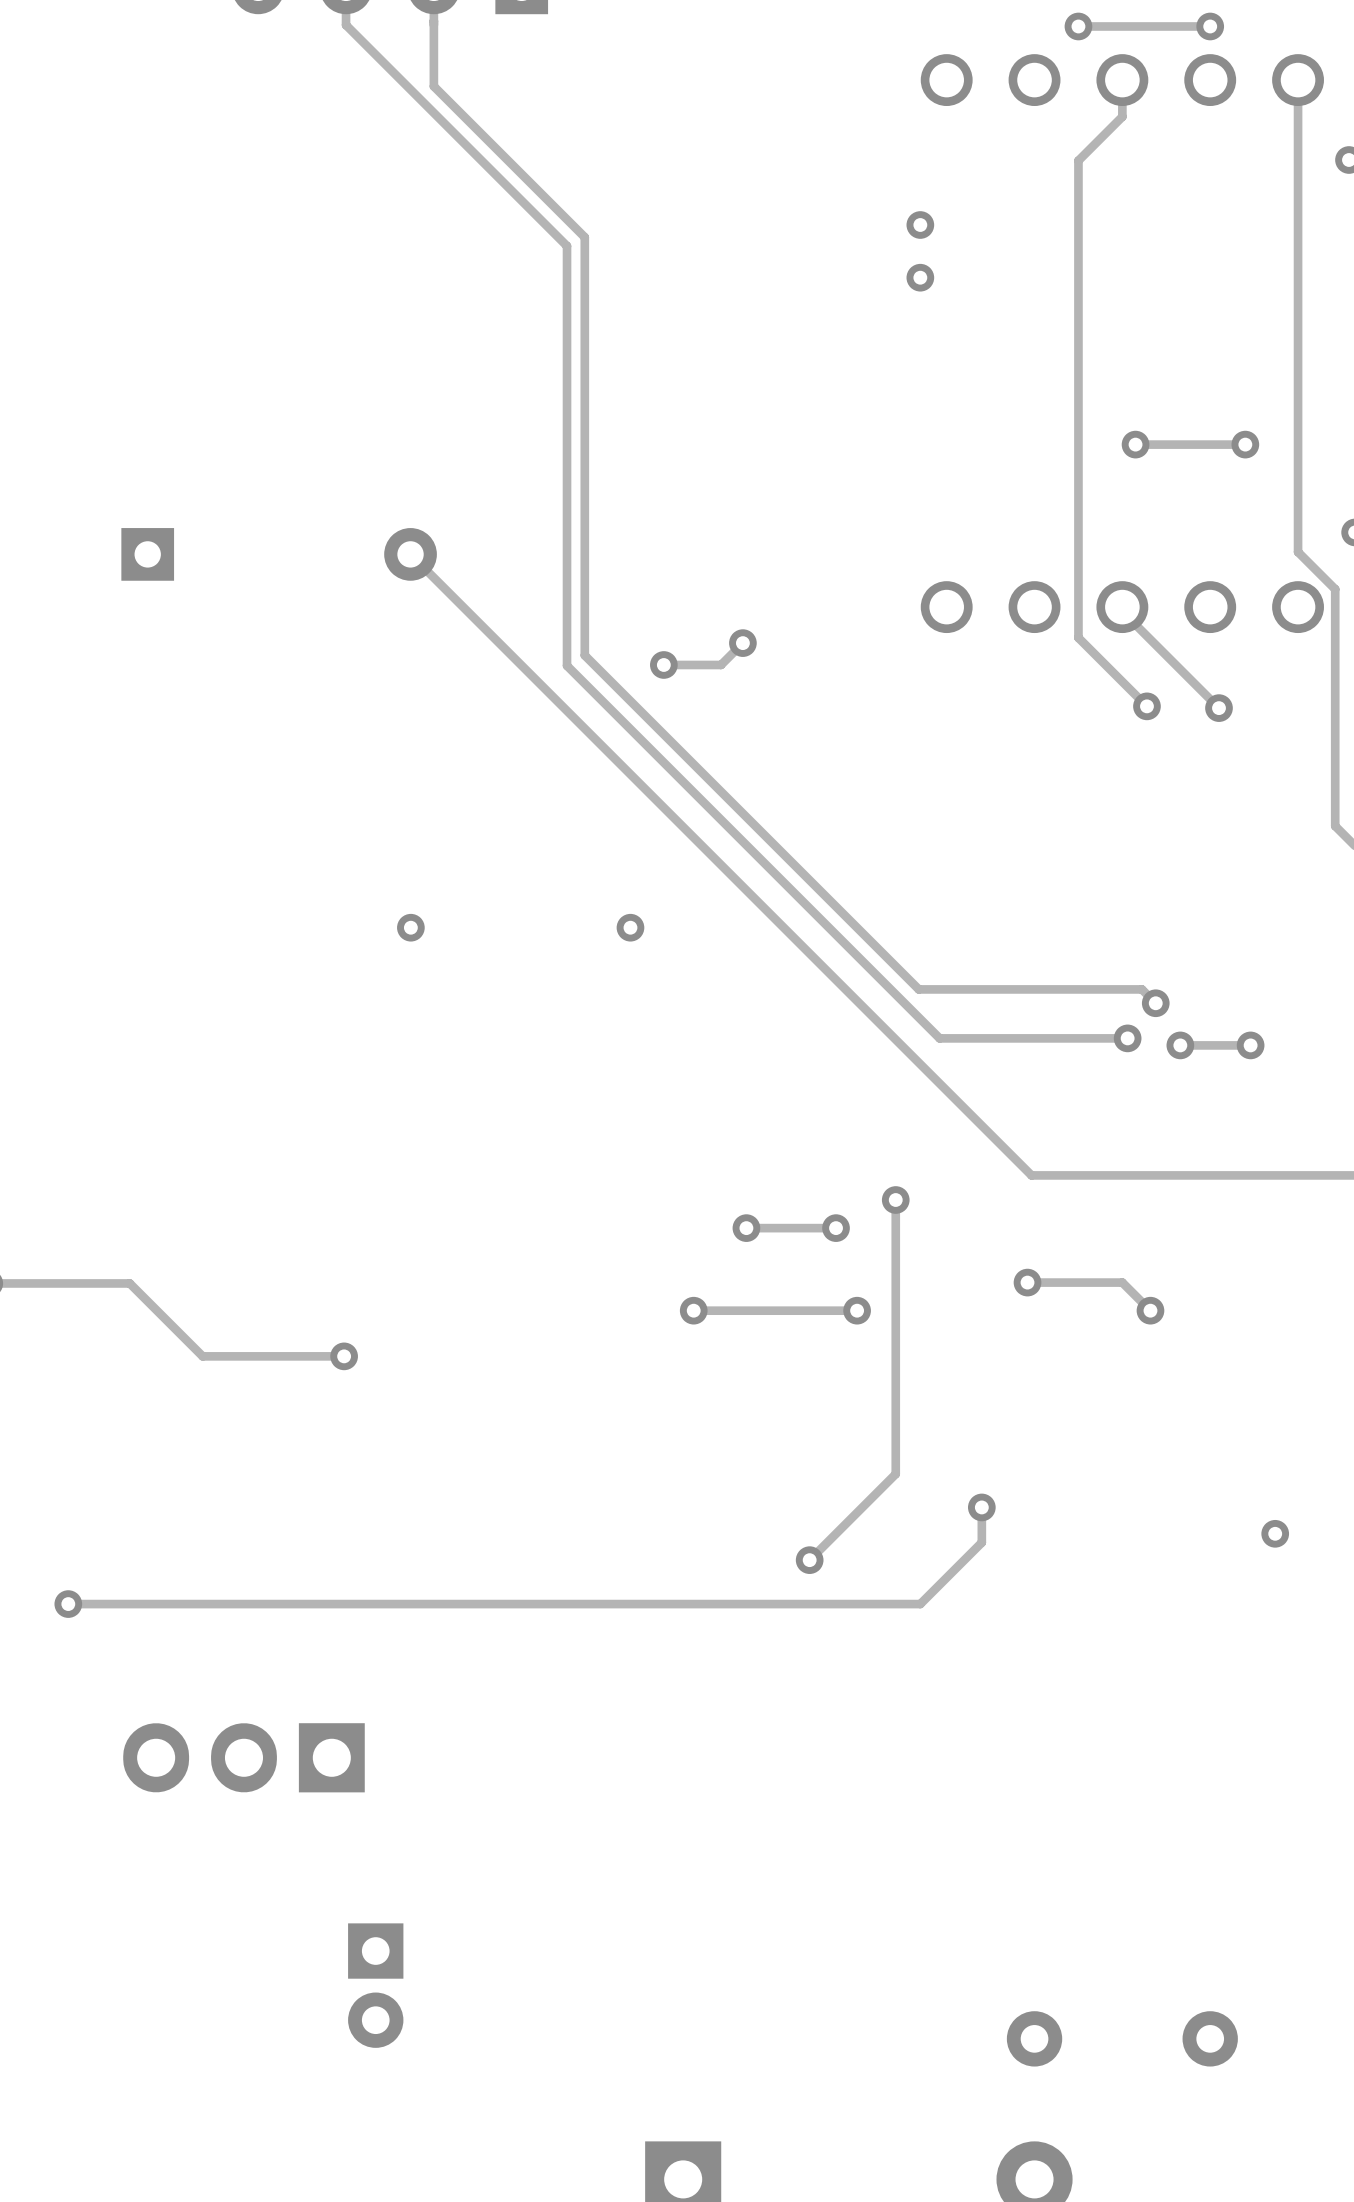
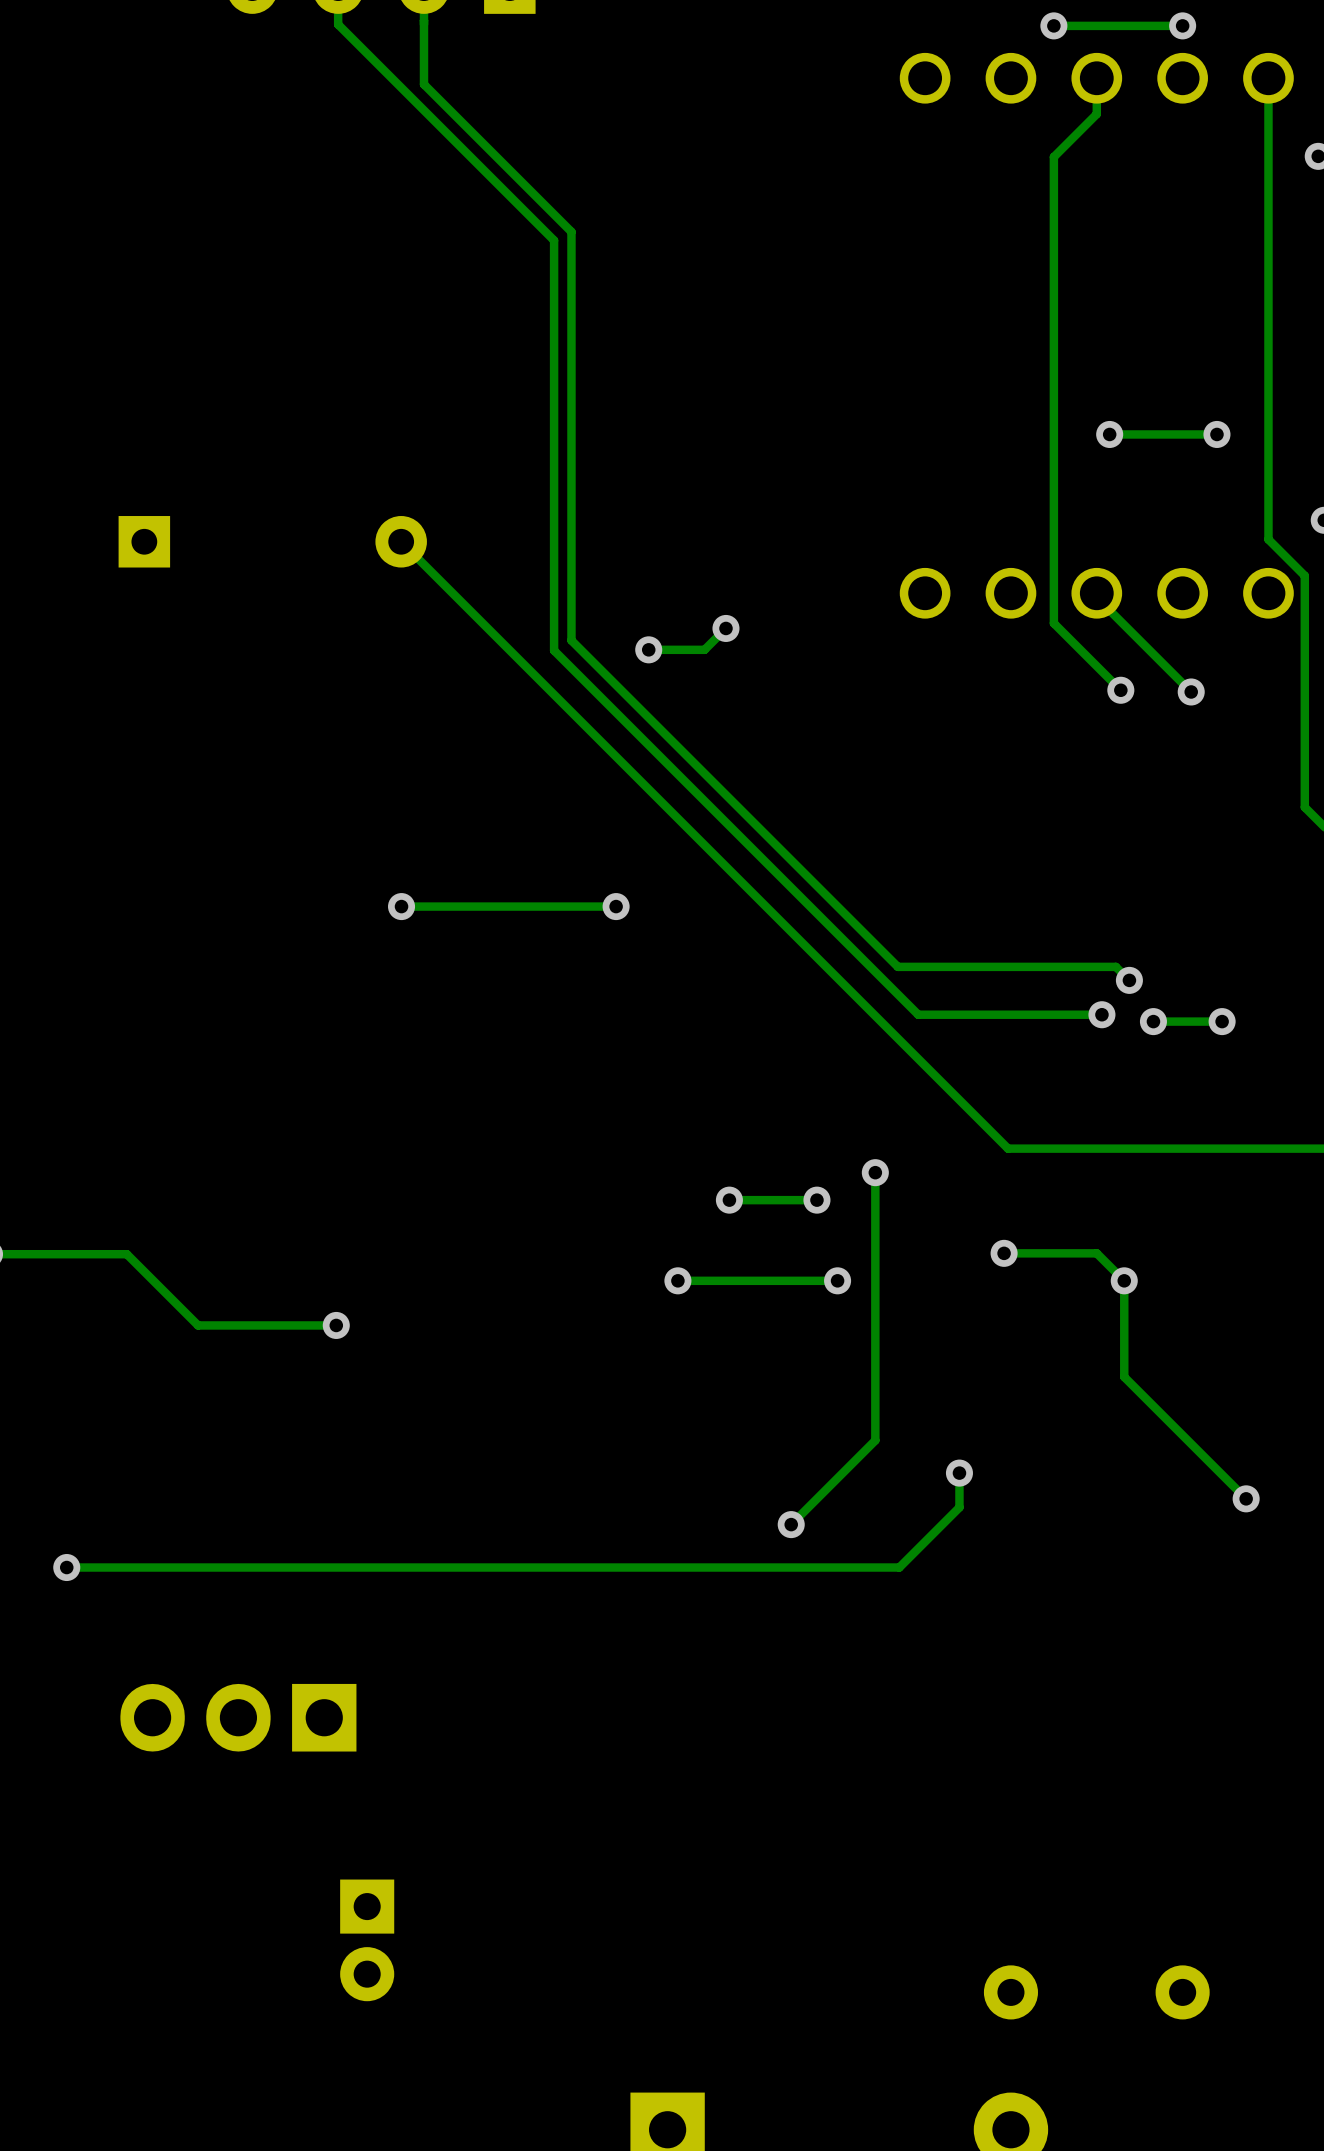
via: (920, 225) -> none
via: (920, 277) -> none
track: none -> (616, 906) (401, 906)
track: none -> (1124, 1280) (1124, 1376) (1246, 1498)

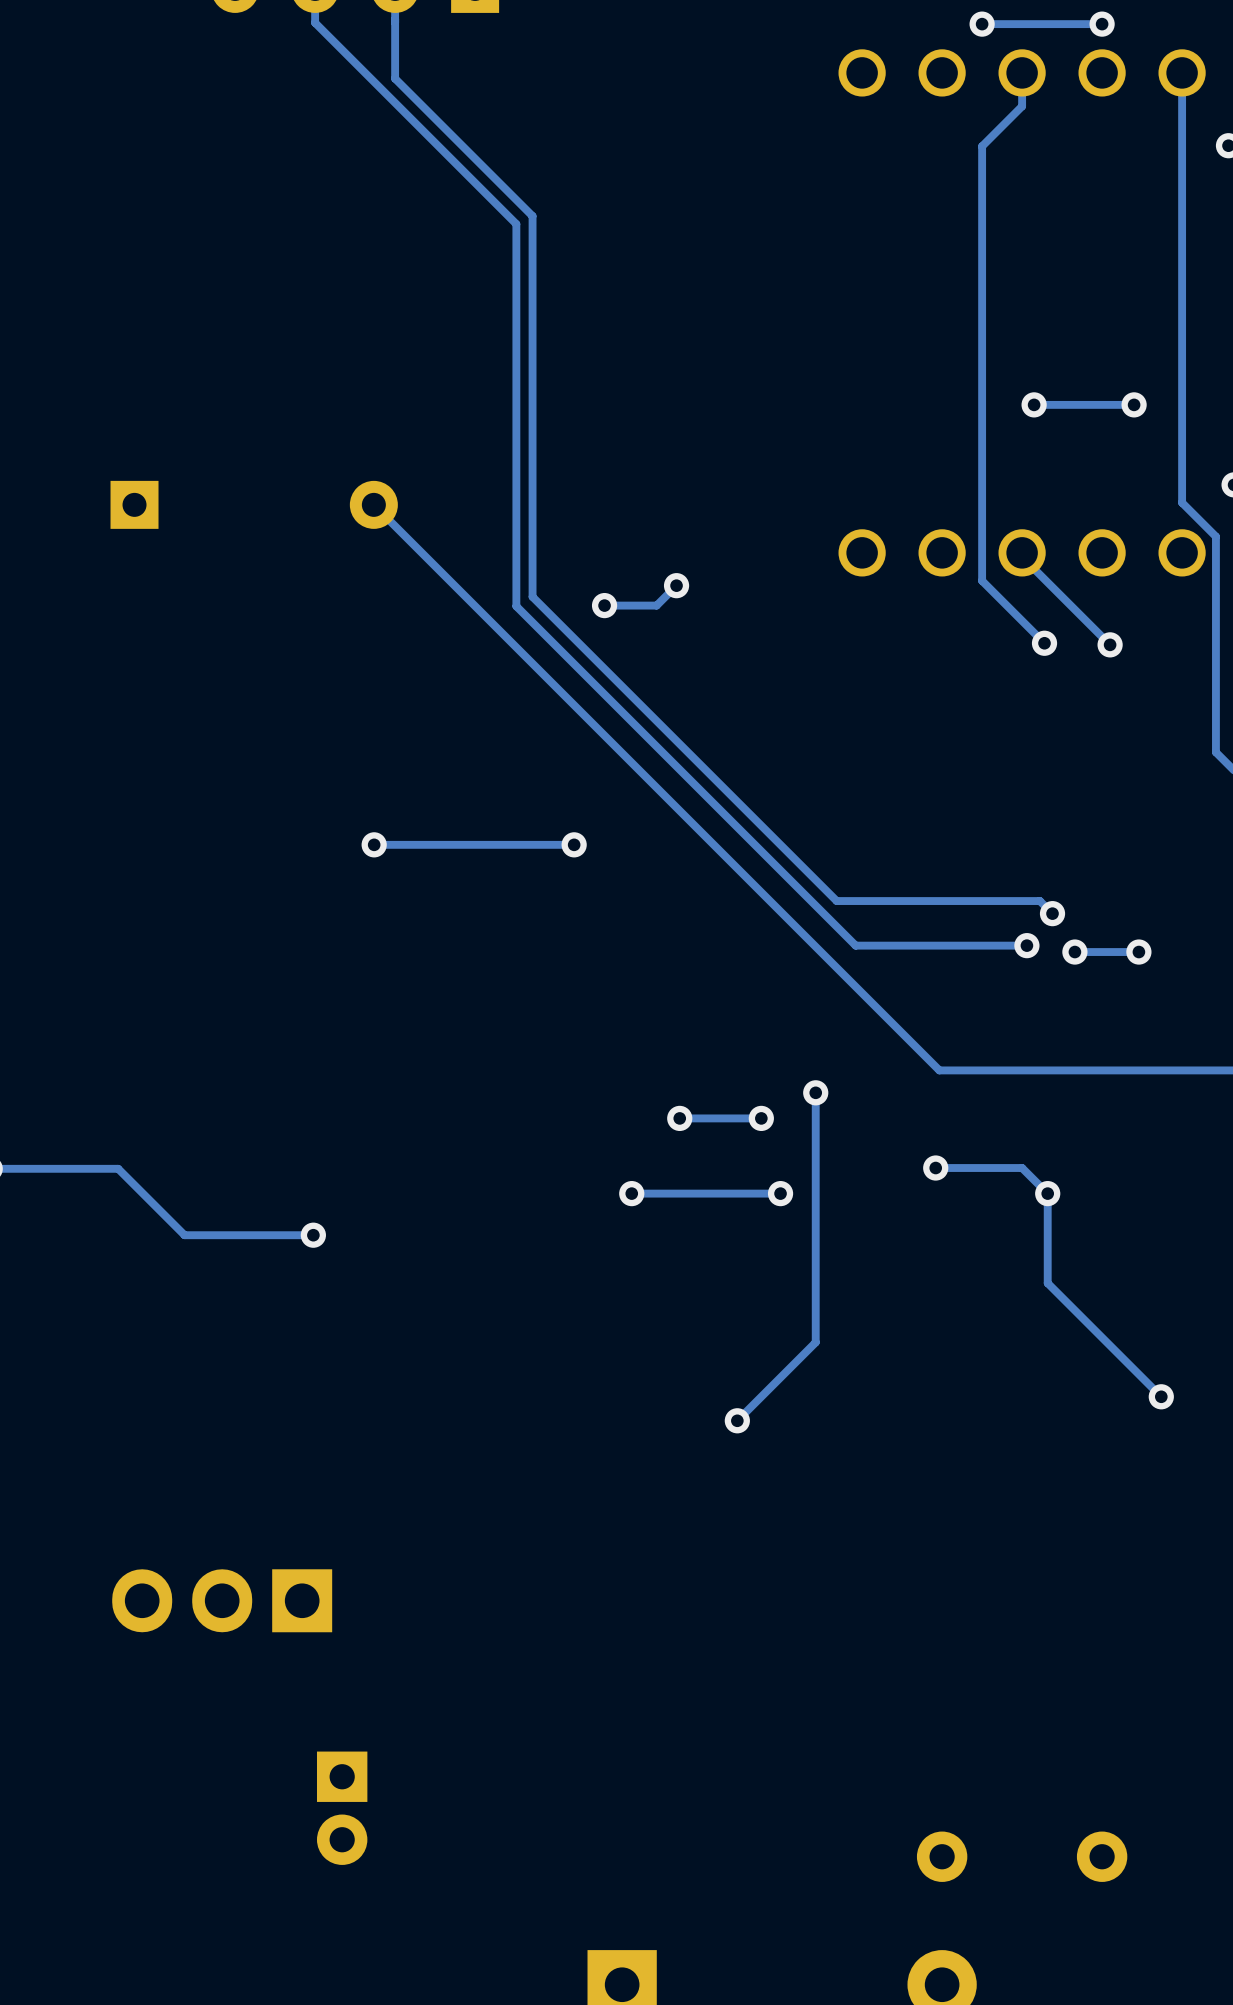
track: (959, 1473) (959, 1507) (899, 1567) (66, 1567) -> none
via: (959, 1473) -> none
via: (66, 1567) -> none

